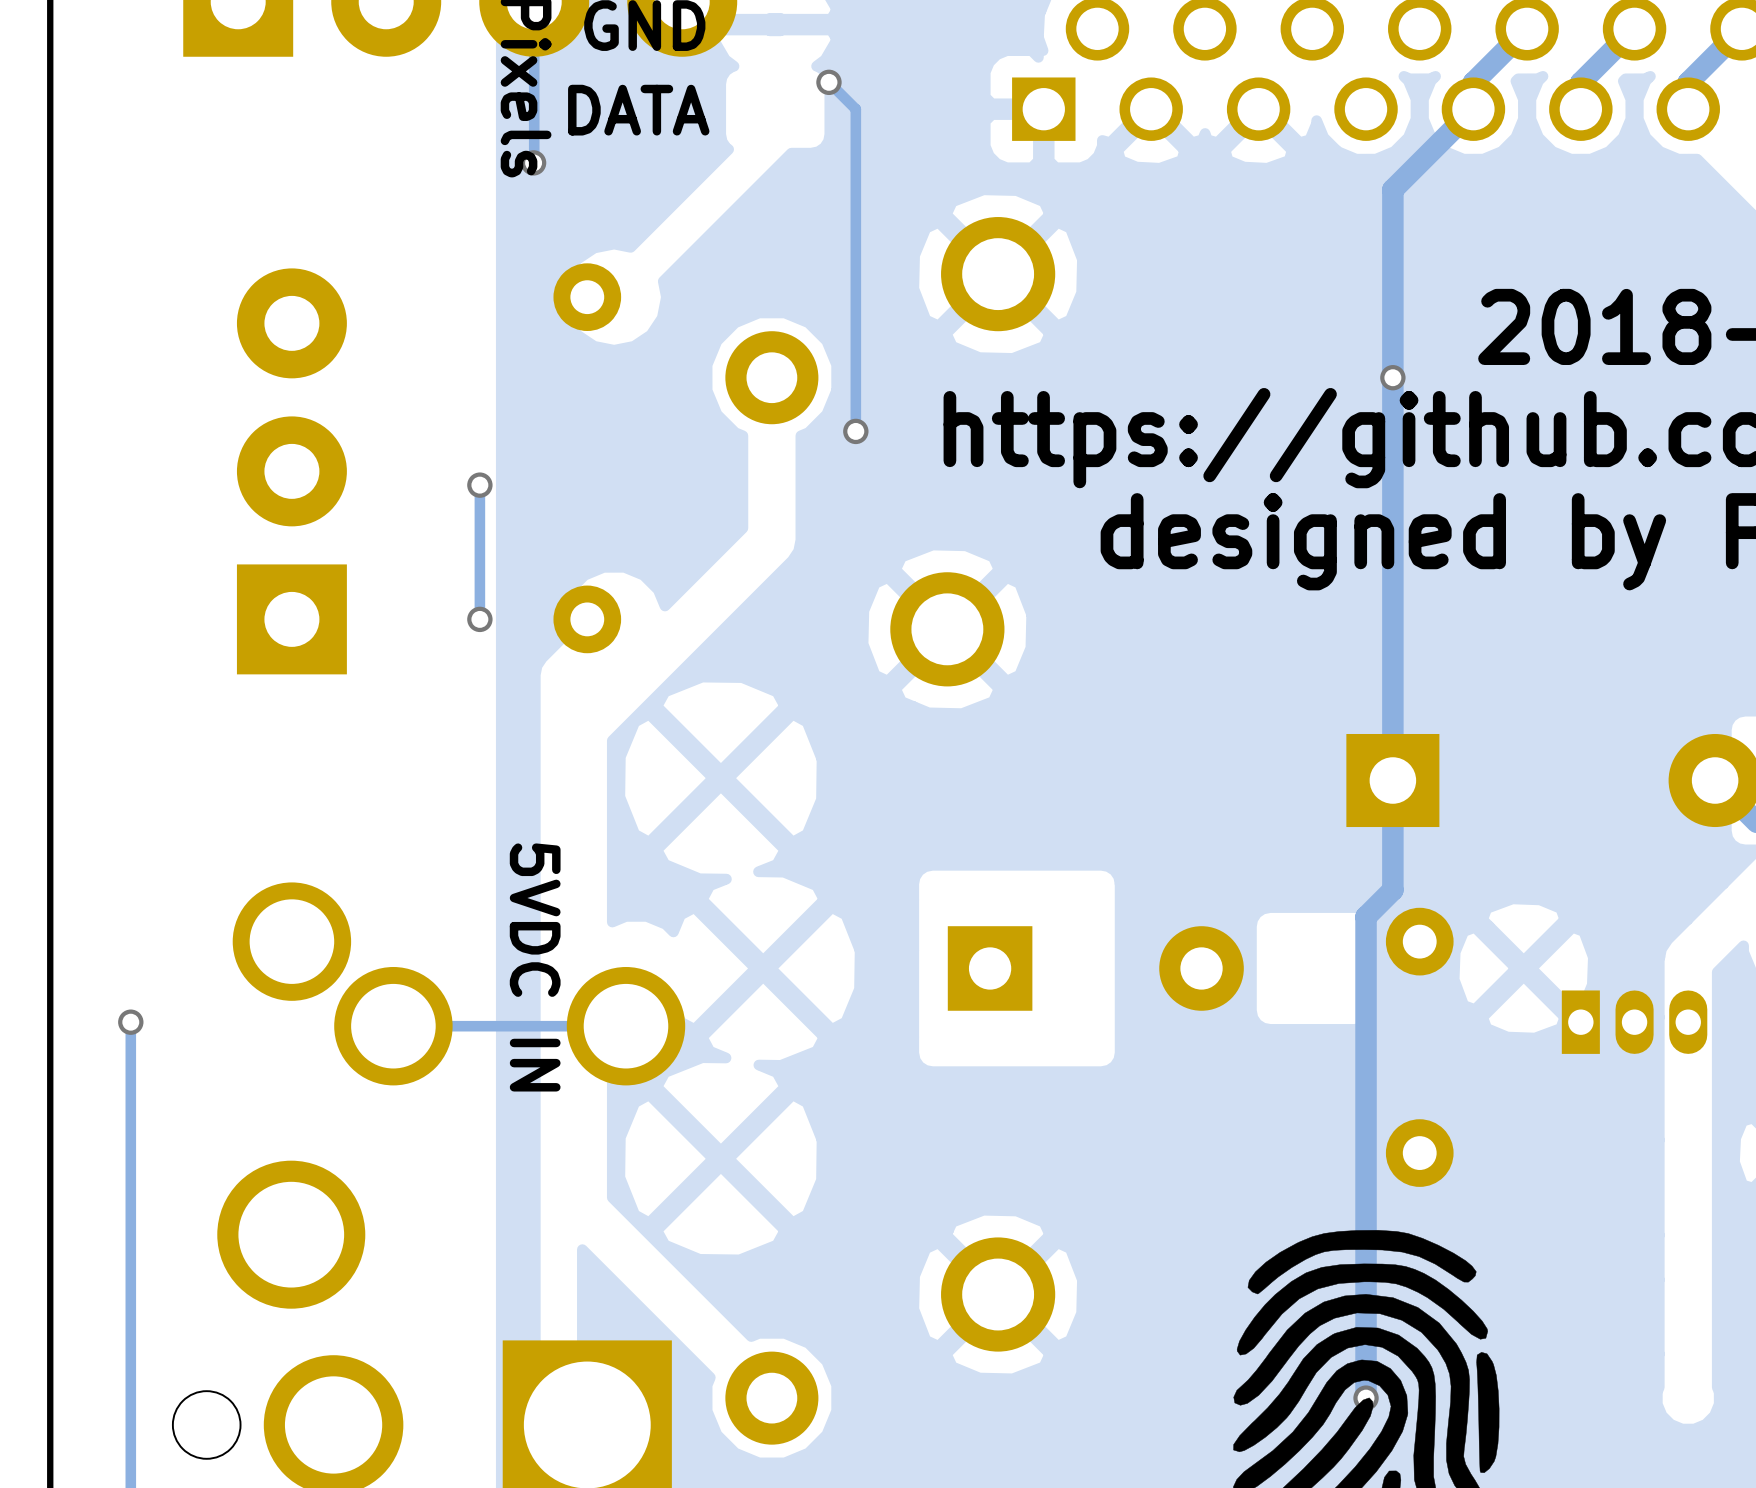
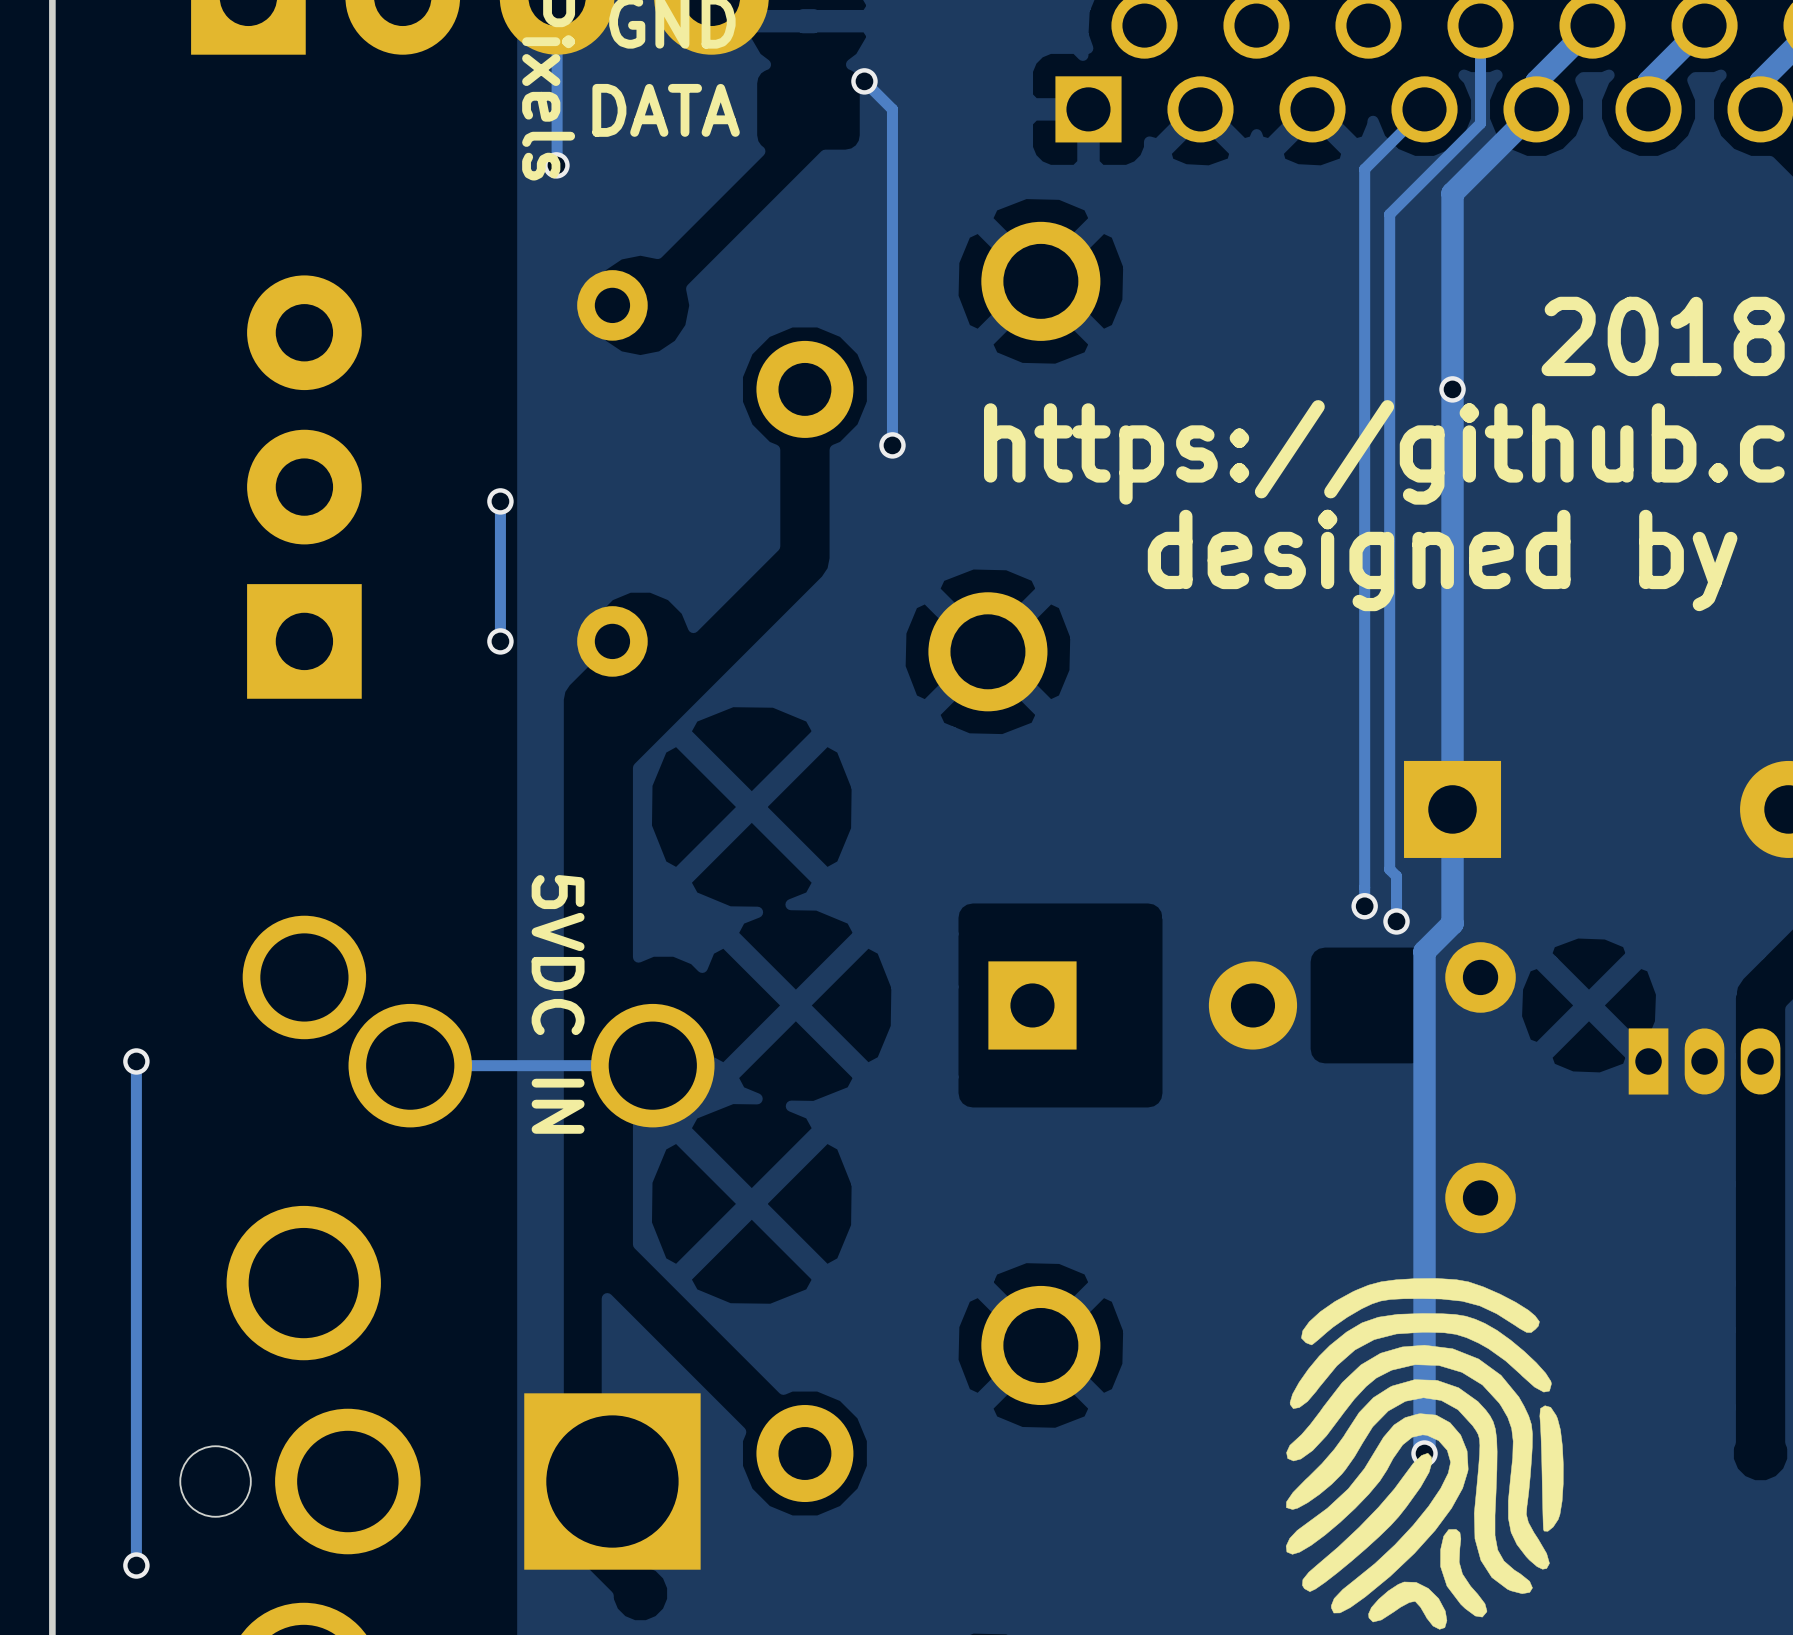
track: none -> (1480, 25) (1480, 123) (1389, 214) (1389, 869) (1396, 876) (1396, 921)
track: none -> (1424, 109) (1364, 169) (1364, 906)
via: none -> (1364, 906)
via: none -> (1396, 921)

